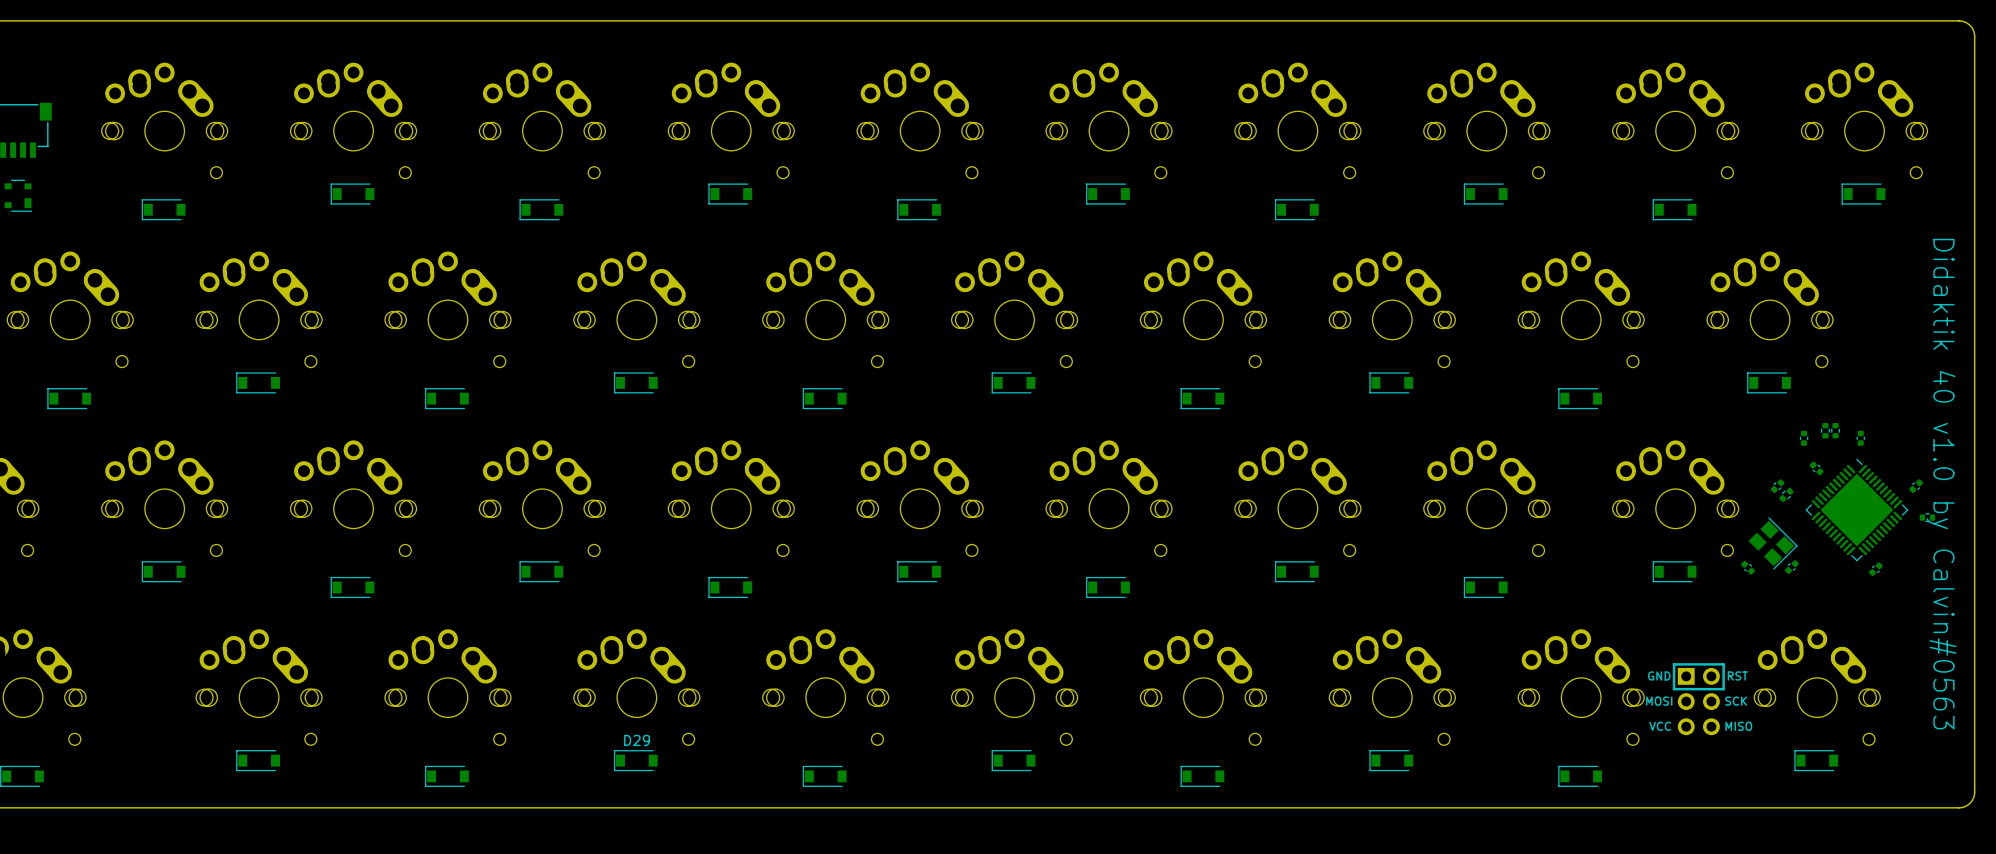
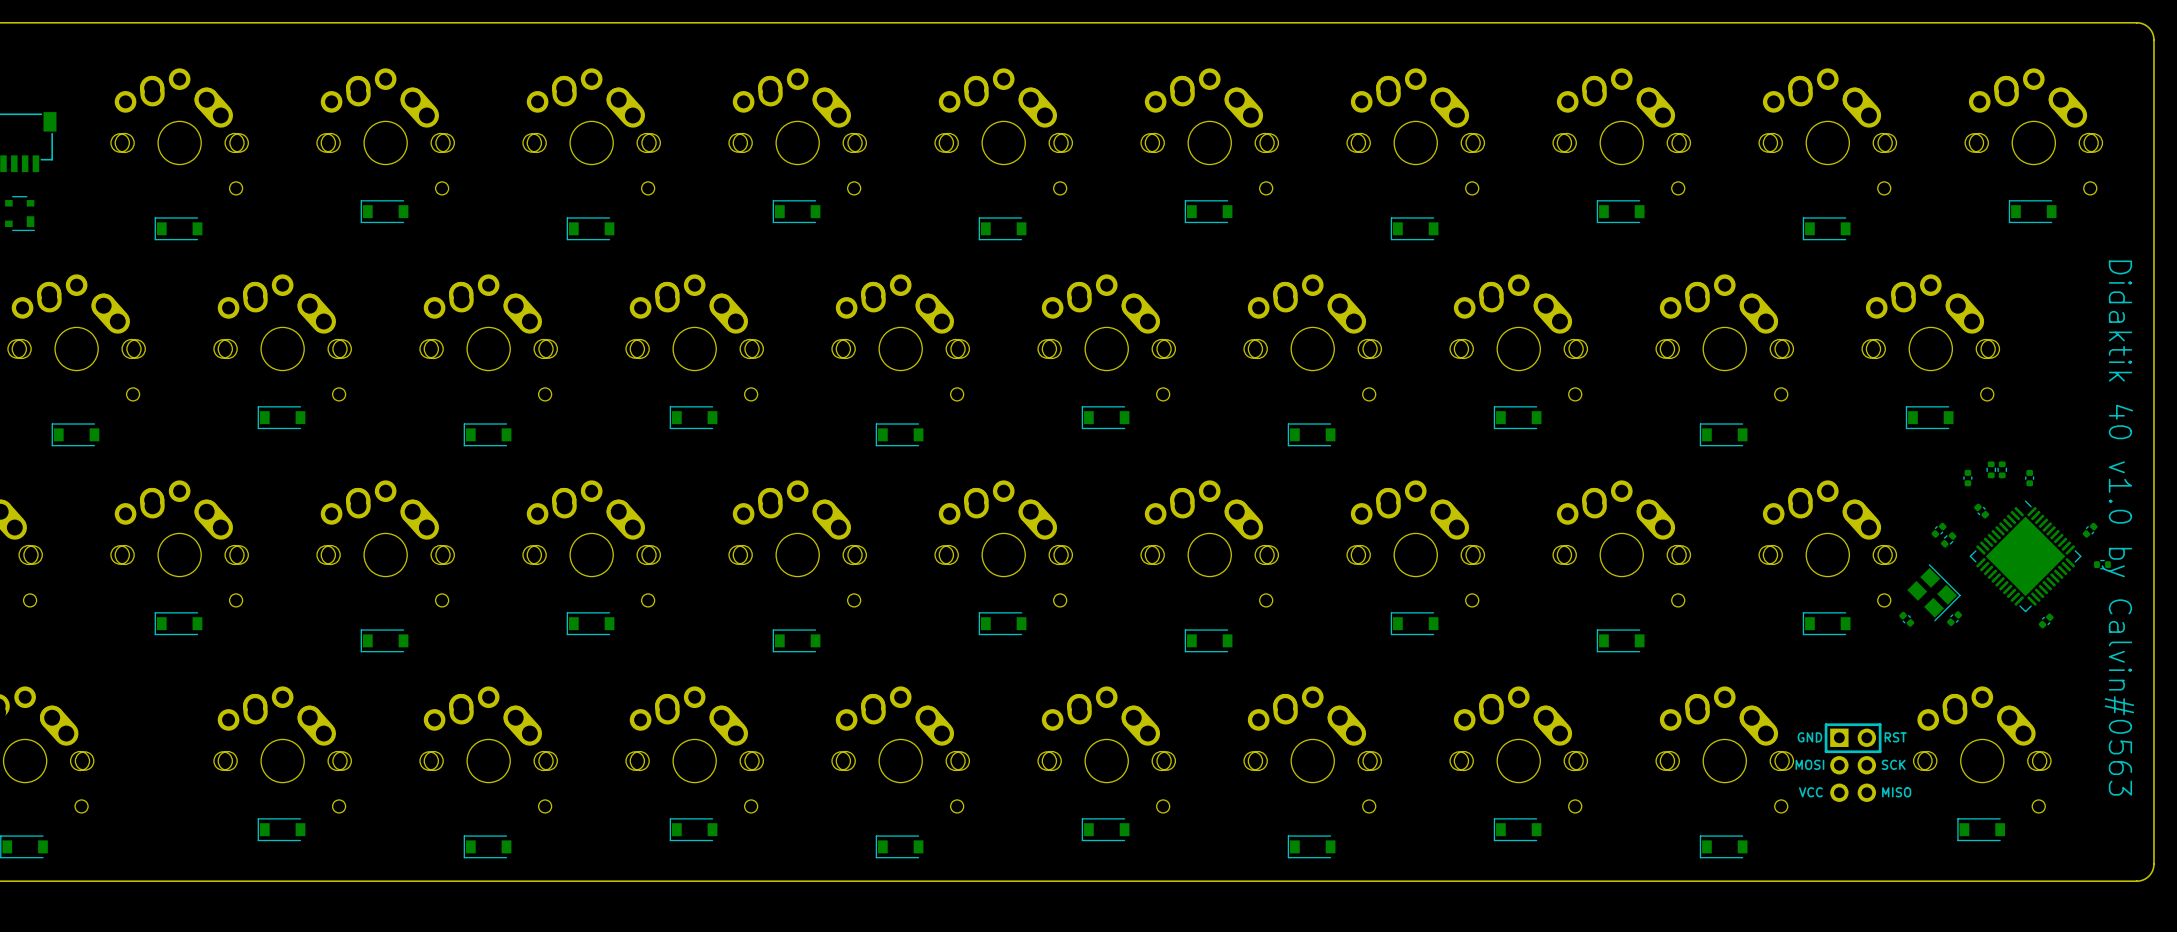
D29 name: D29 (637, 740) -> none

